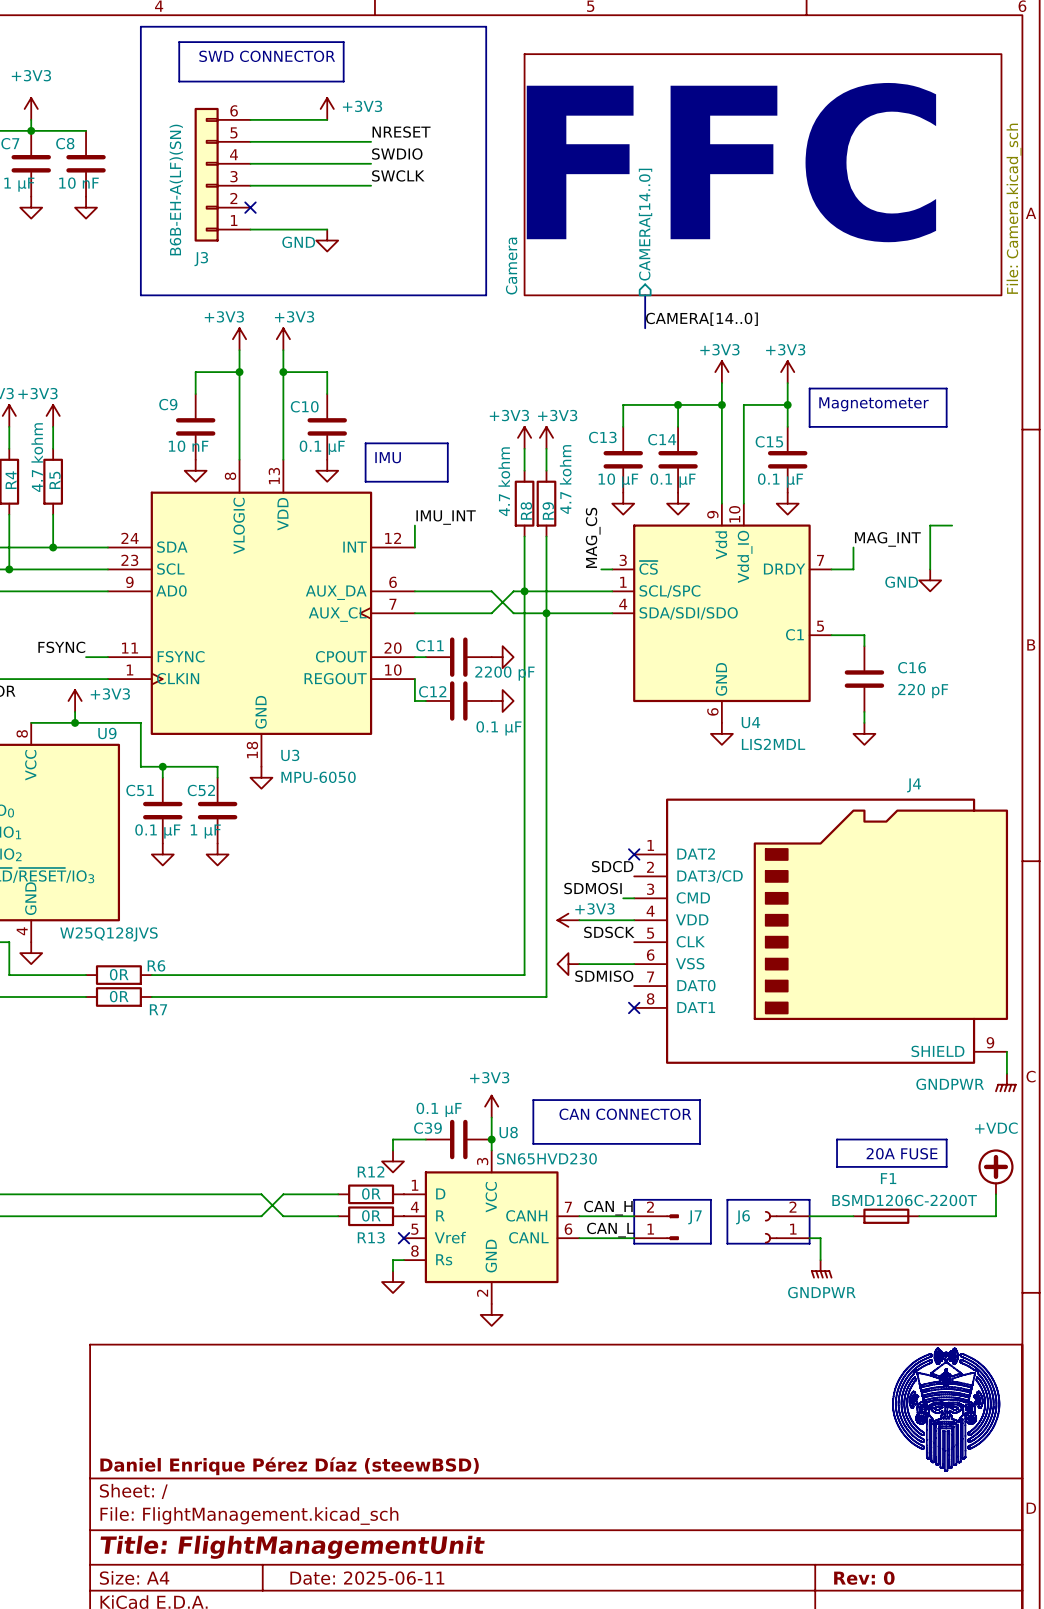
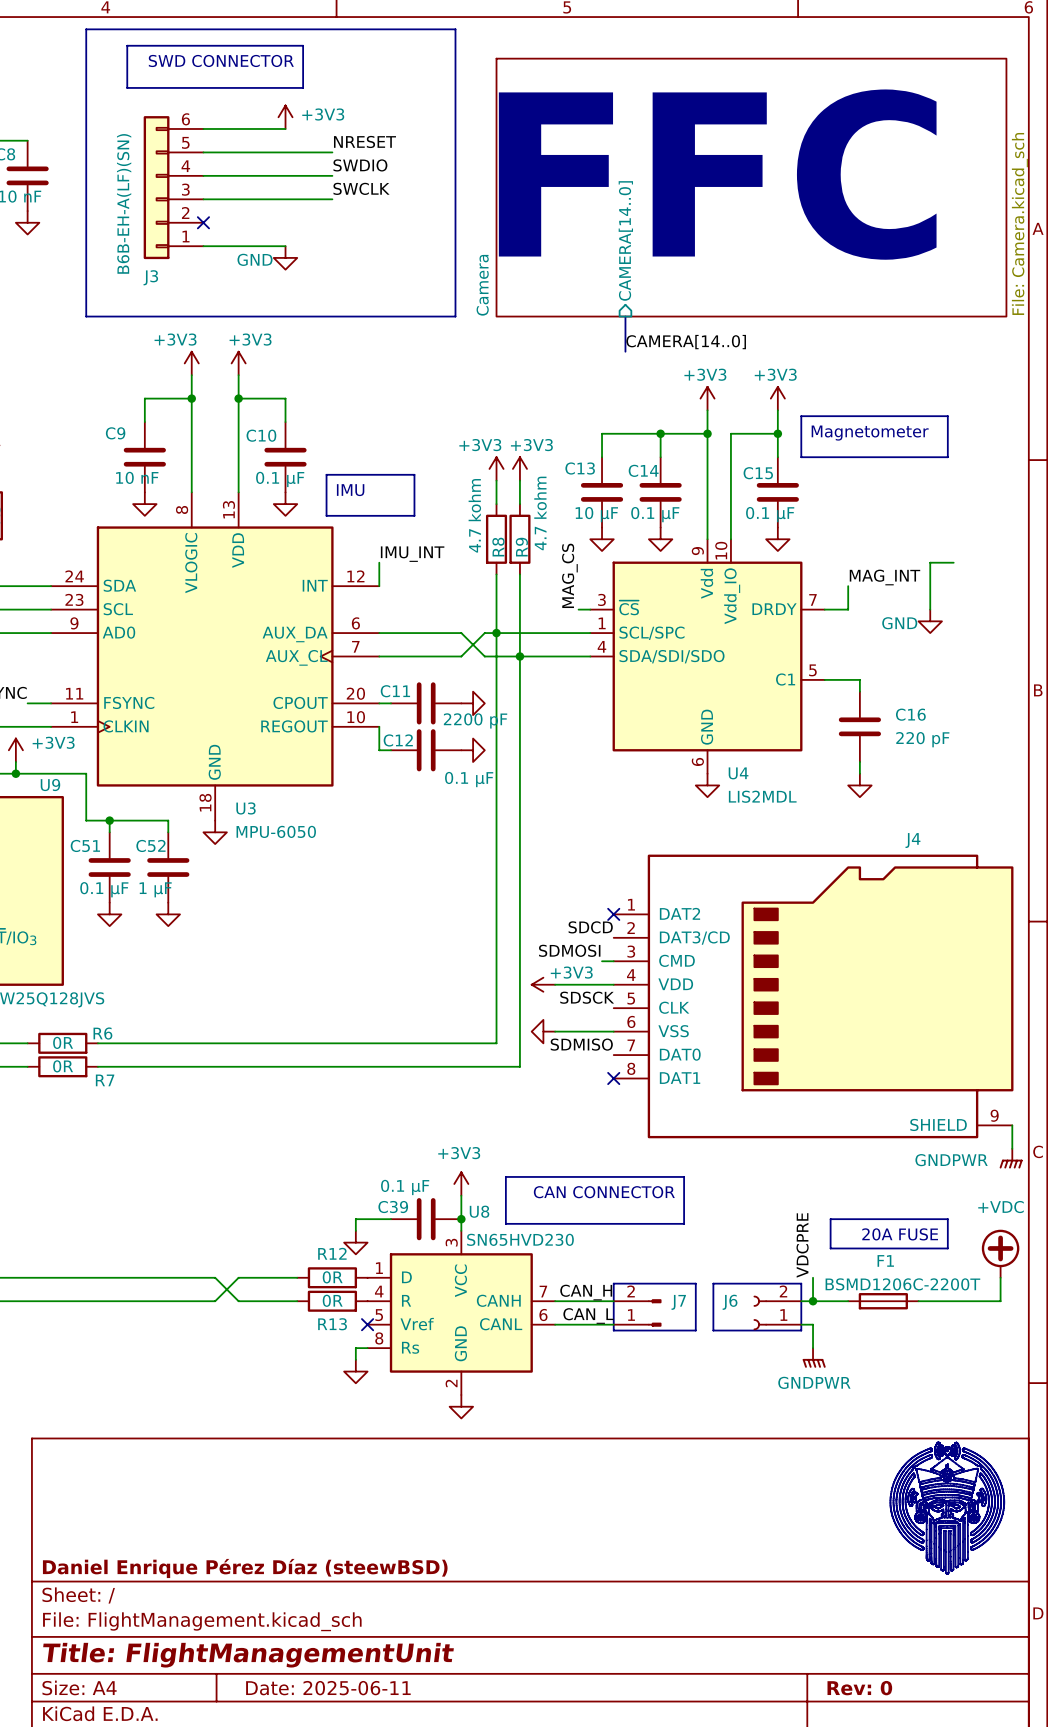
label: none -> VDCPRE (802, 1245)
wire: none -> (813, 1277) (813, 1301)
junction: none -> (813, 1301)

